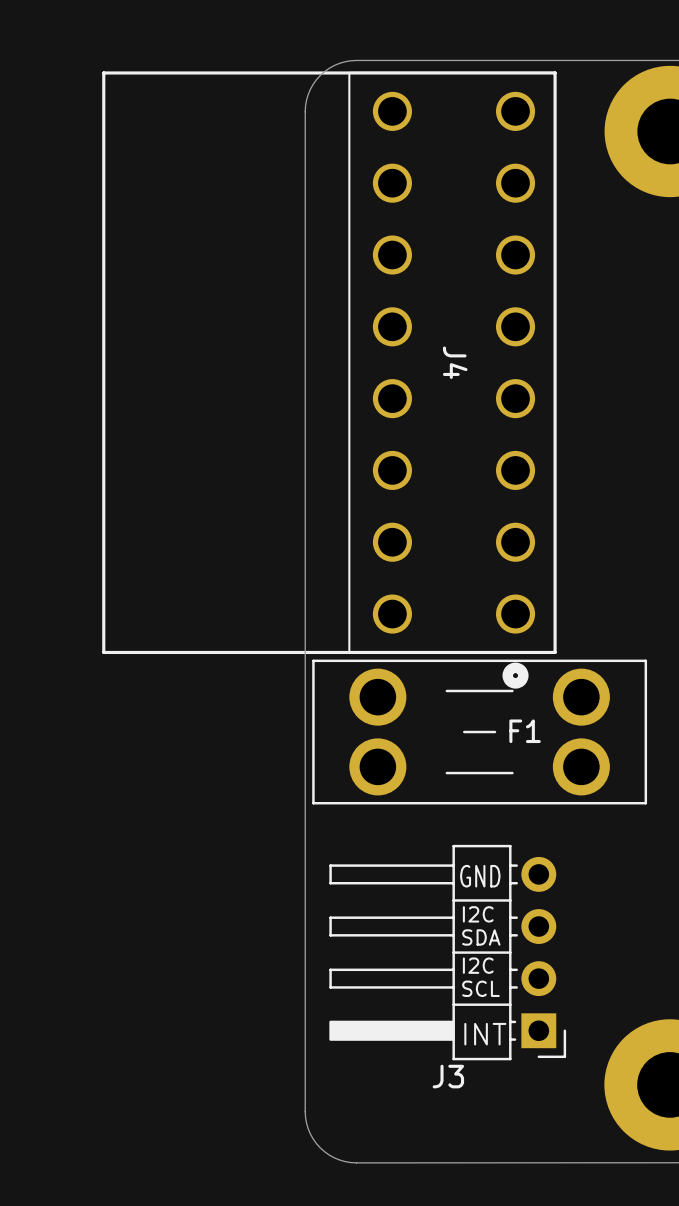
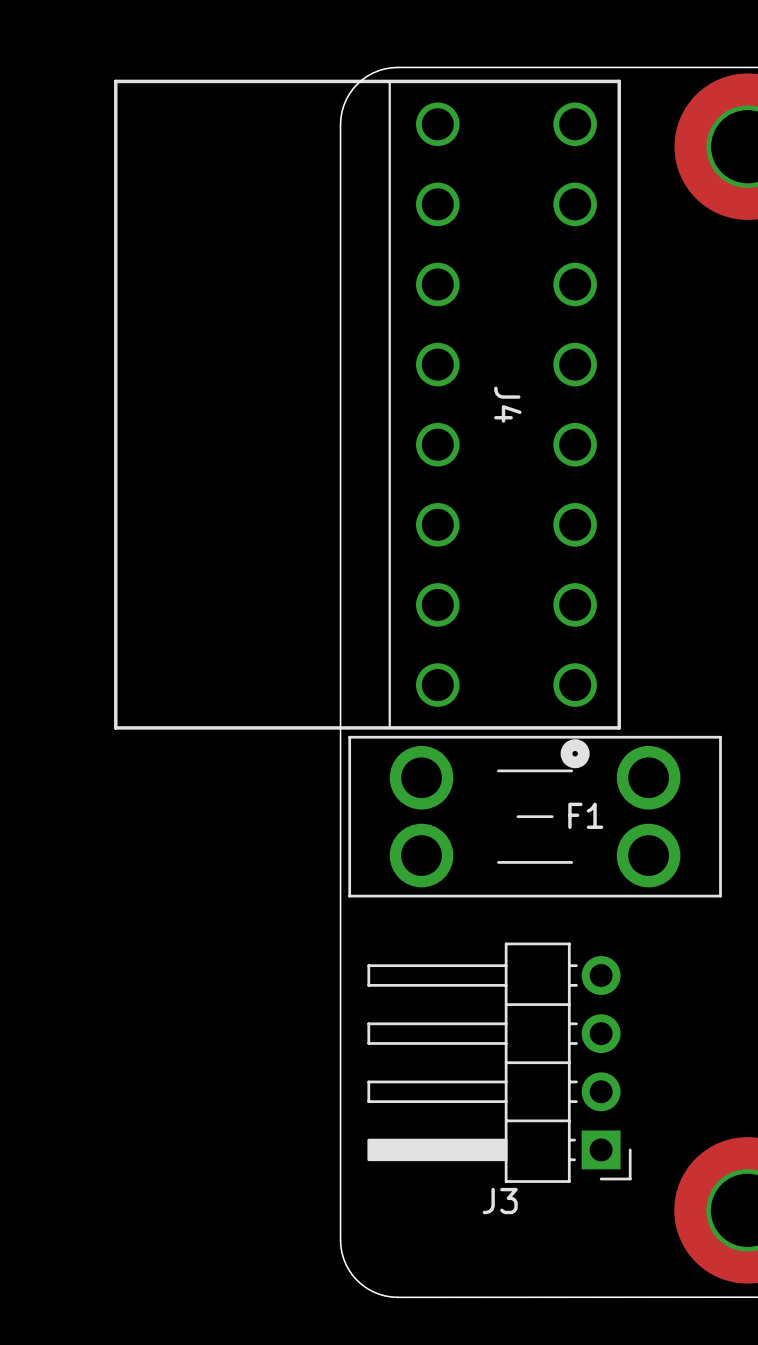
text: GND (480, 876) -> none
text: I2C (478, 914) -> none
text: SDA (481, 937) -> none
text: I2C (478, 965) -> none
text: SCL (480, 988) -> none
text: INT (485, 1034) -> none

